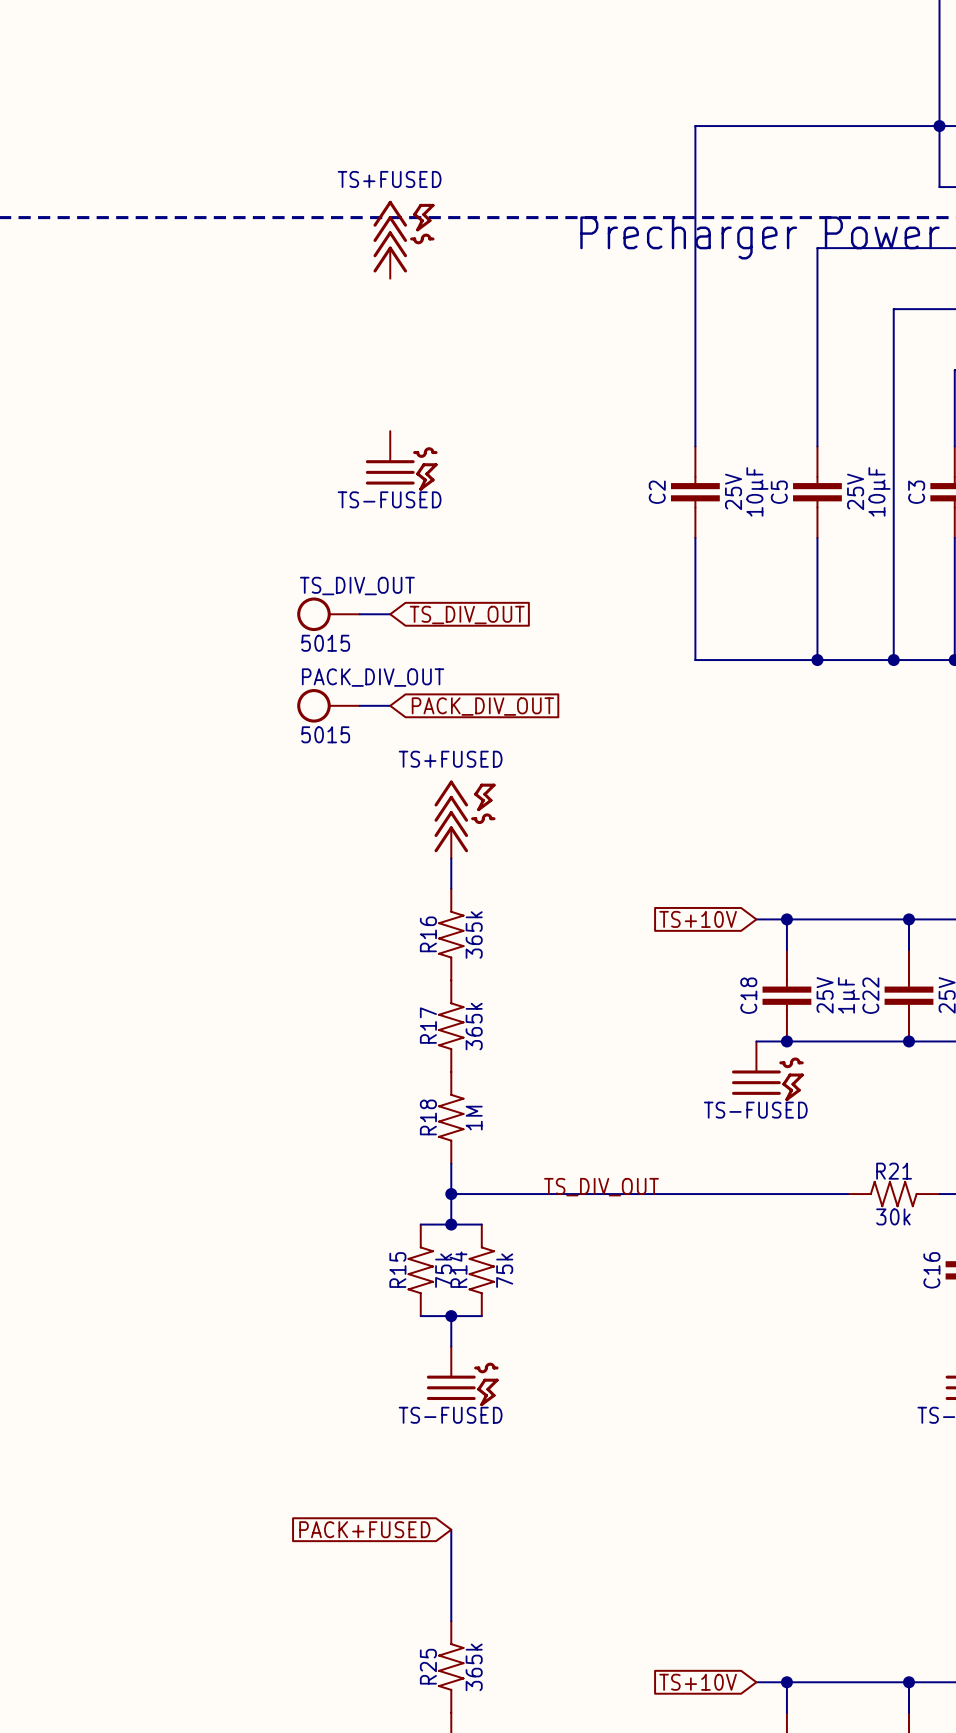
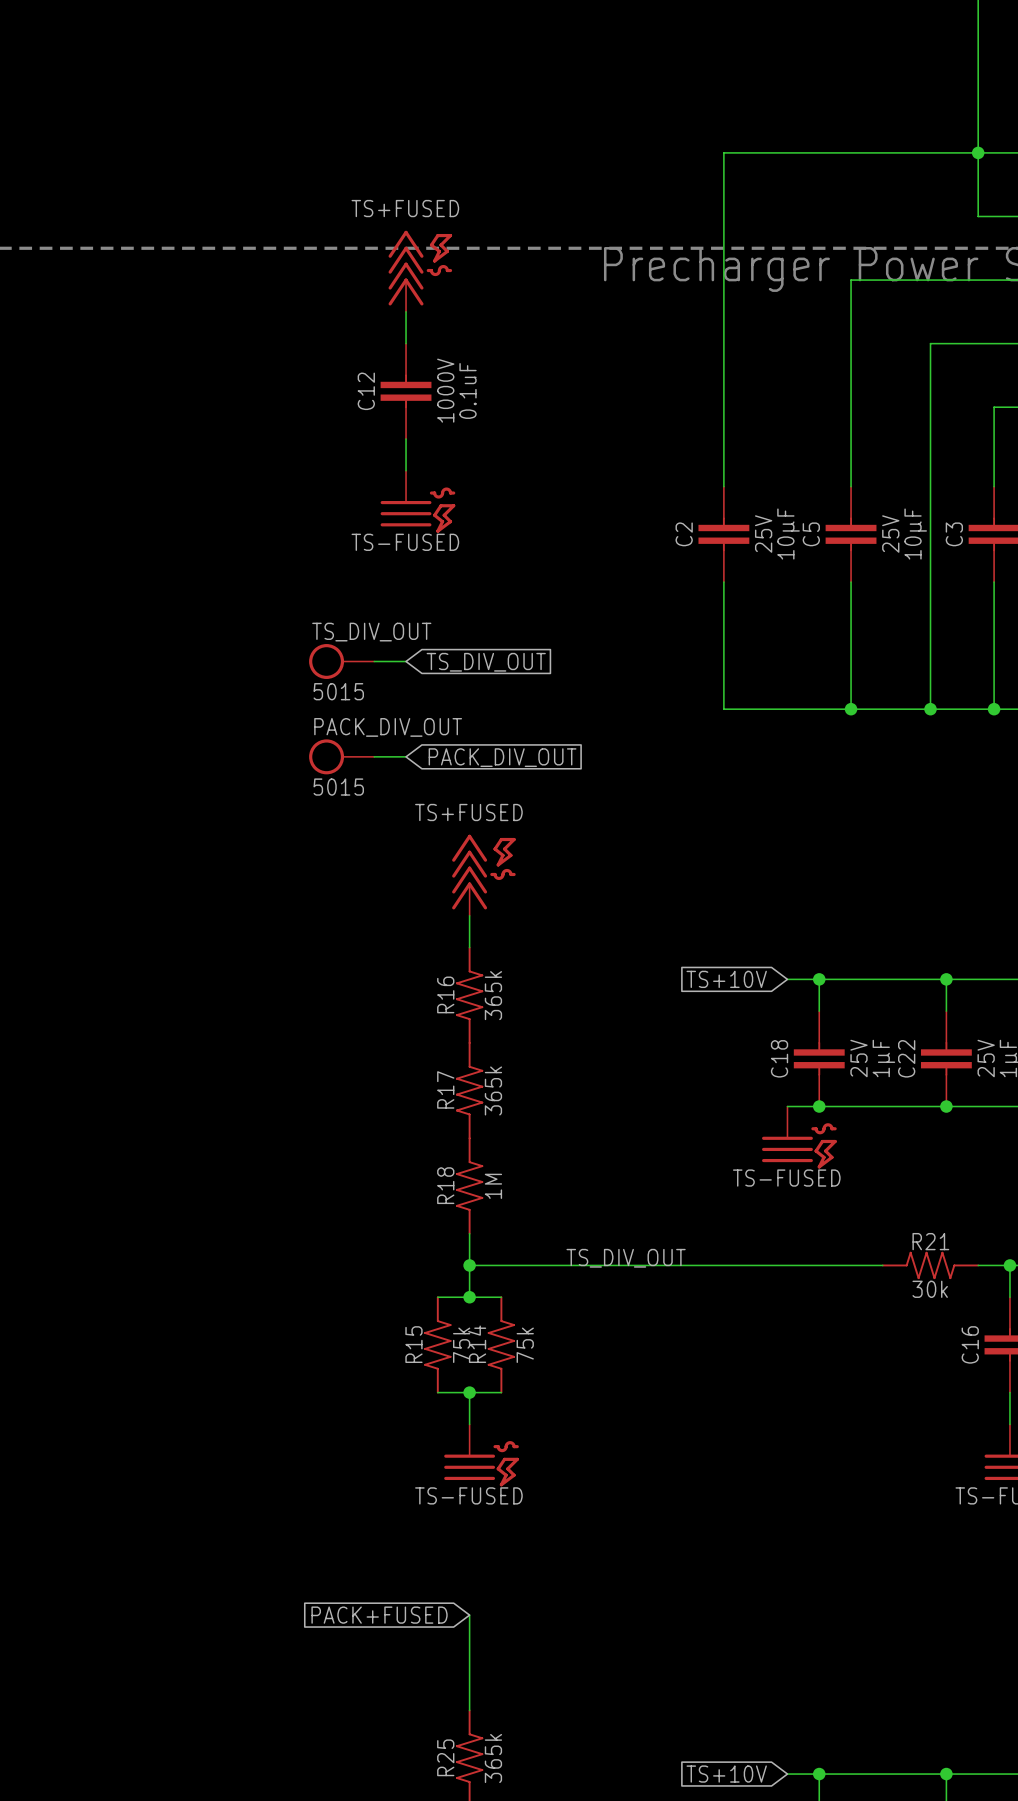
wire: none -> (406, 311) (406, 343)
C12: none -> (406, 391)
wire: none -> (406, 439) (406, 470)

